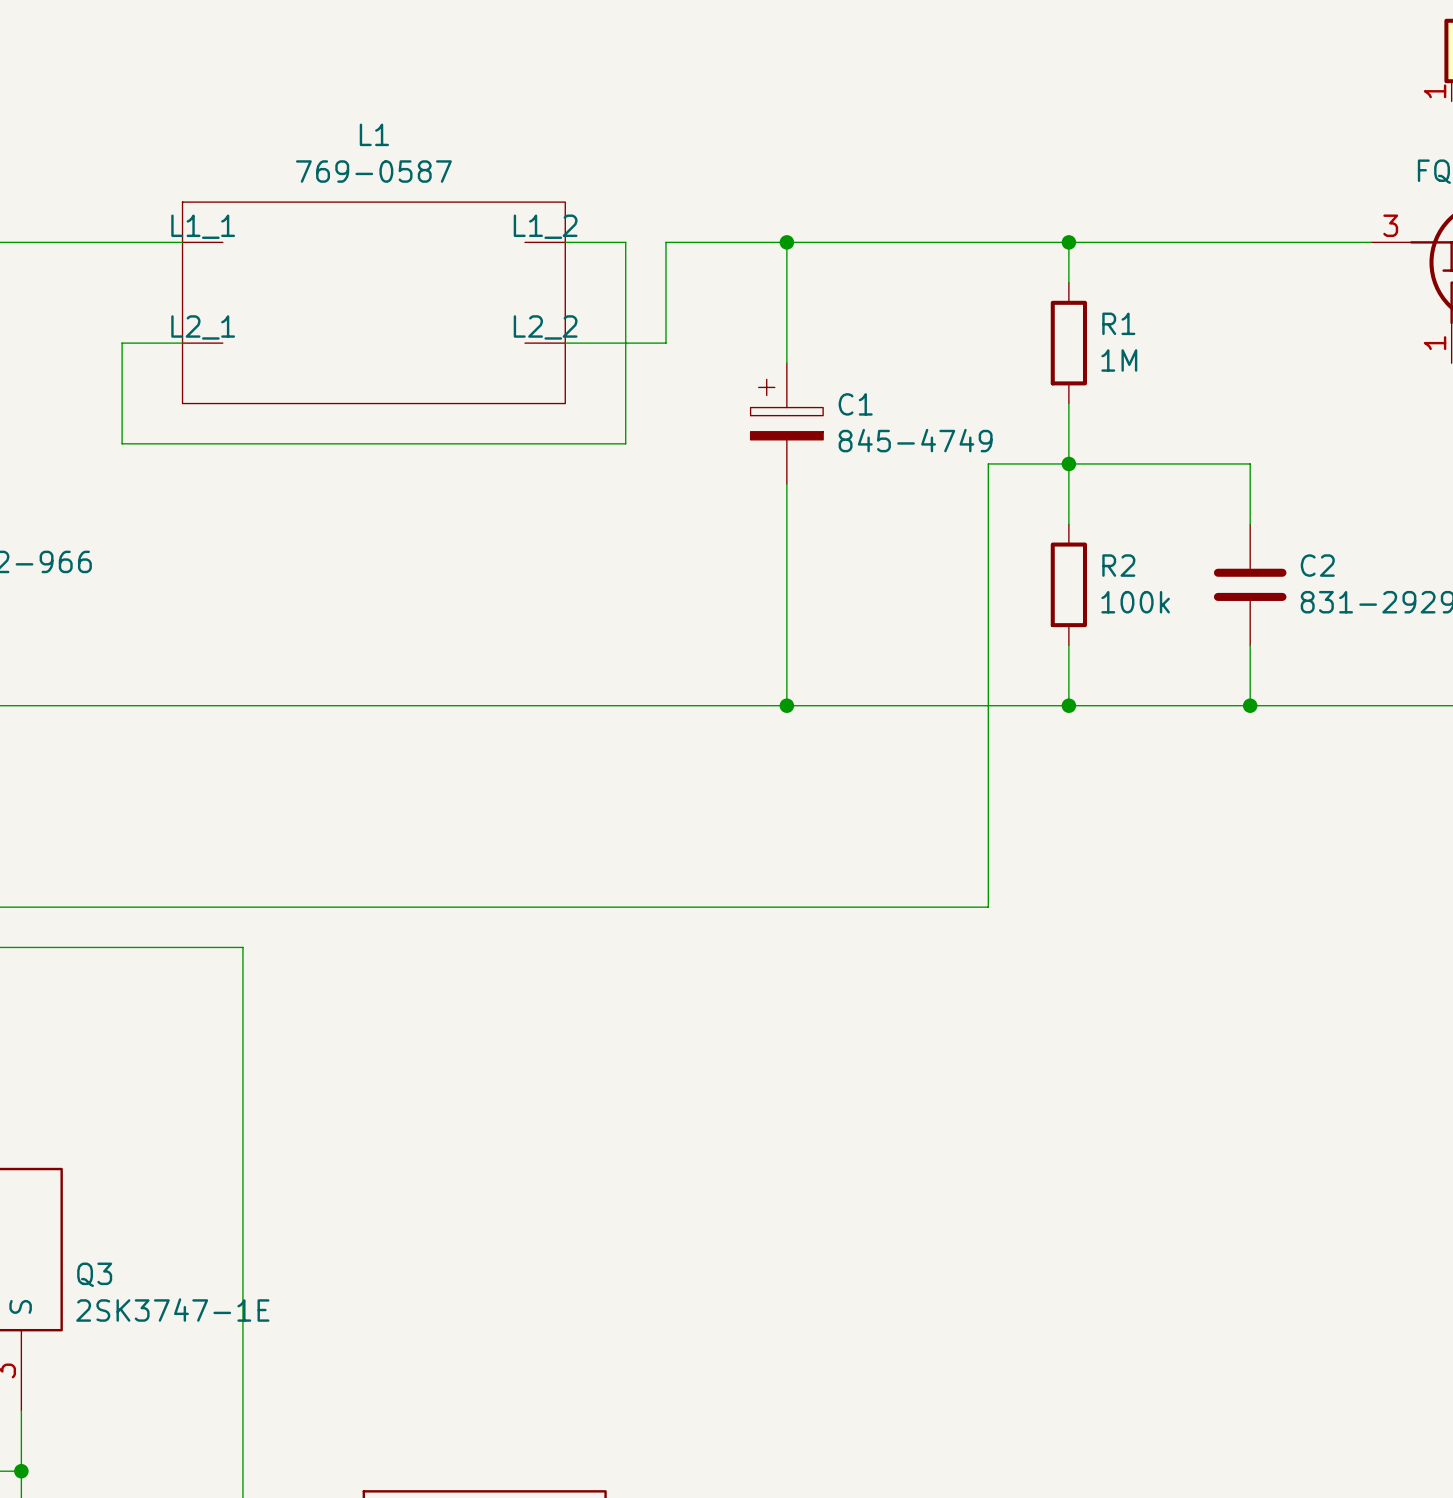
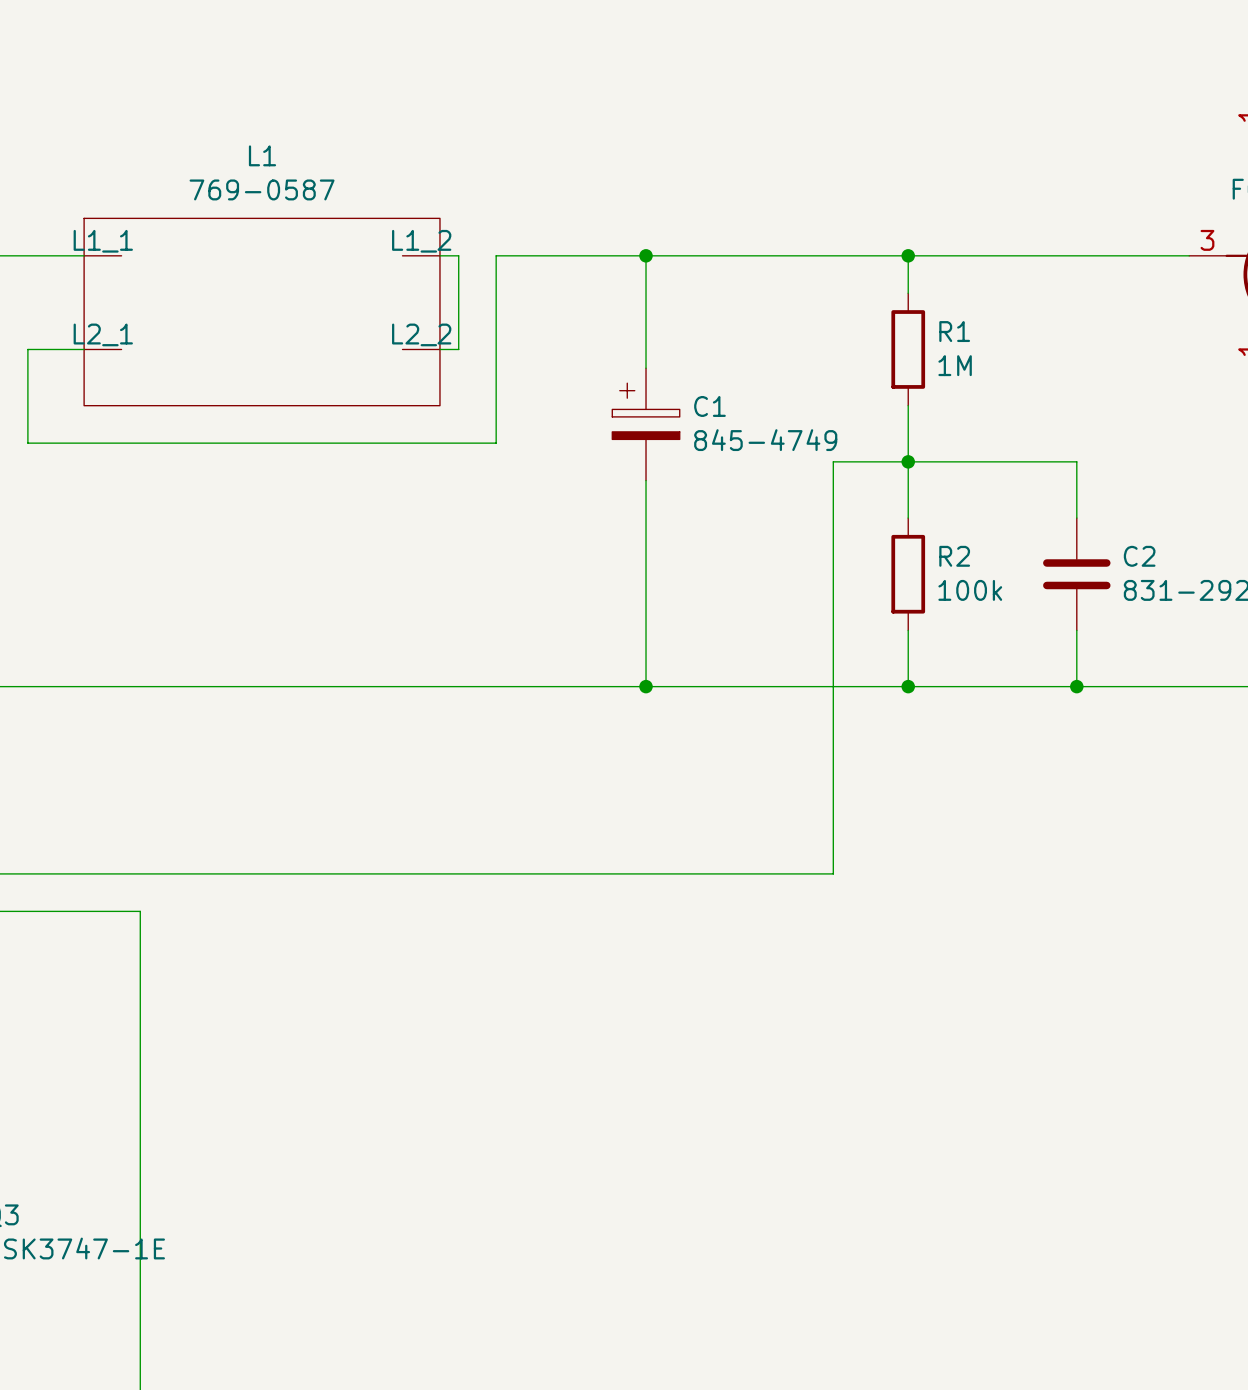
wire: (585, 242) (625, 242) -> (533, 255) (496, 255)
wire: (665, 242) (665, 343) (585, 343) -> (458, 255) (458, 349)

